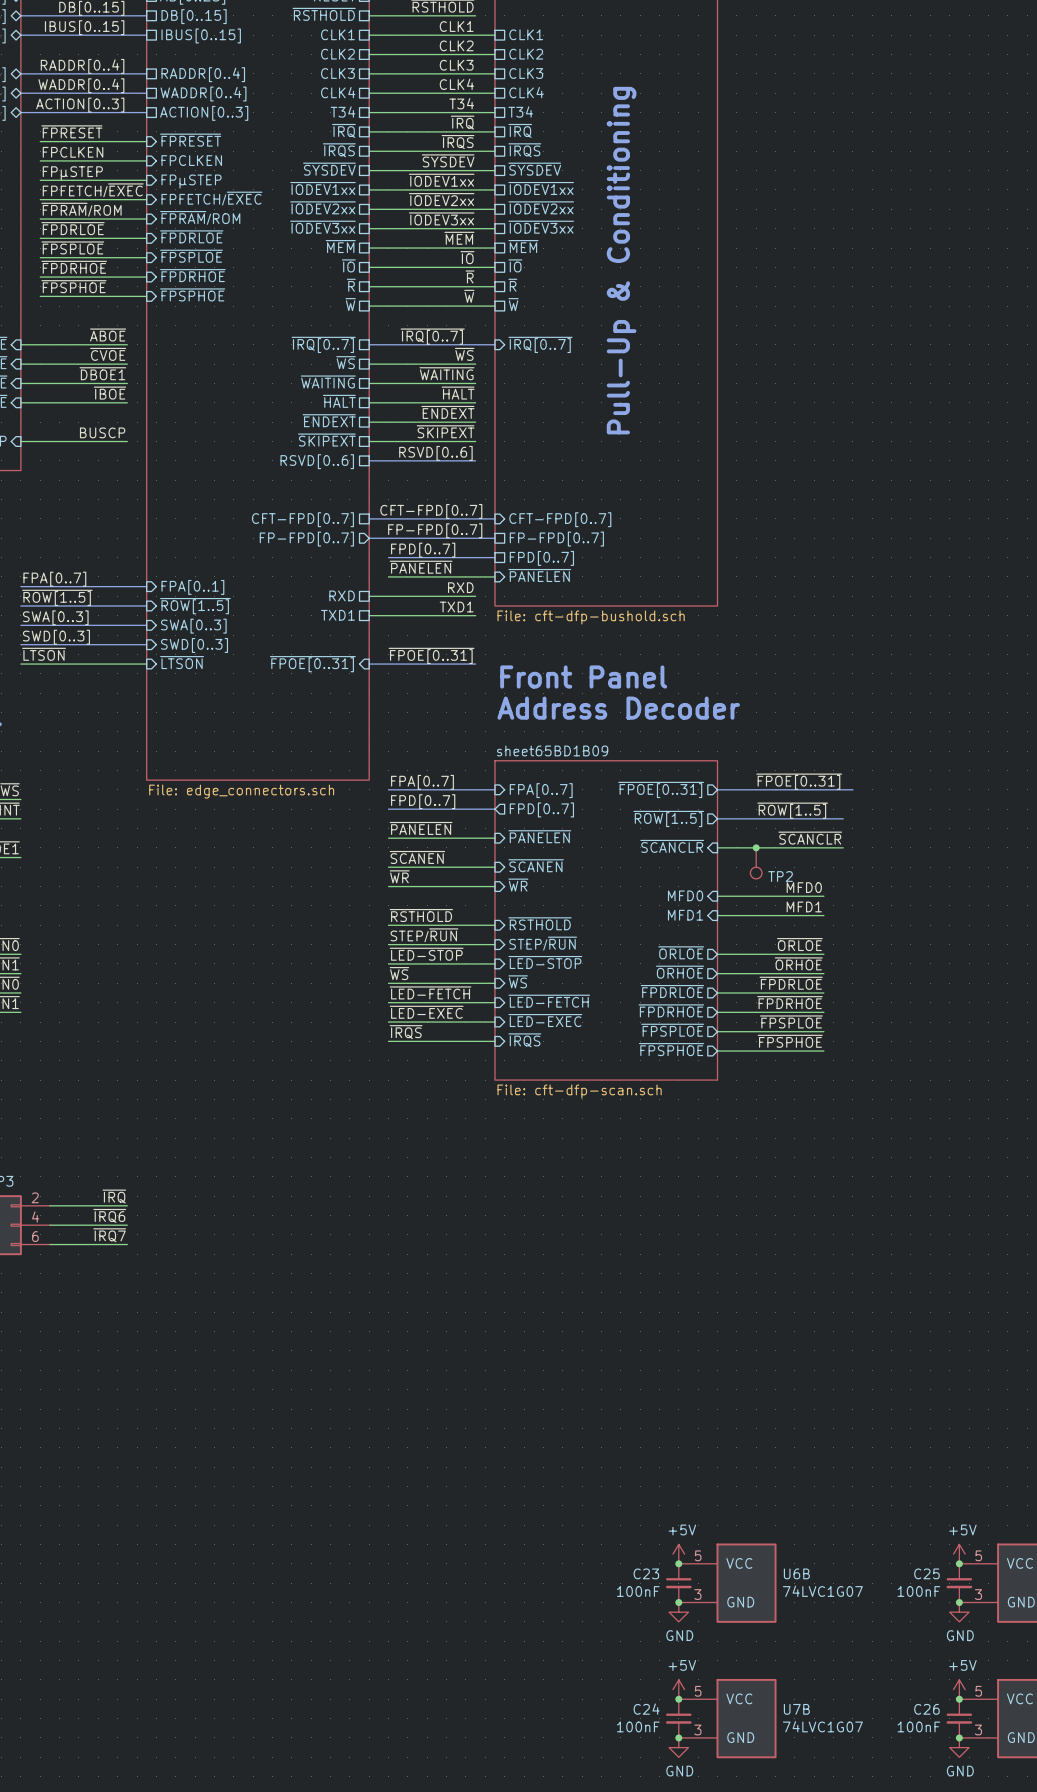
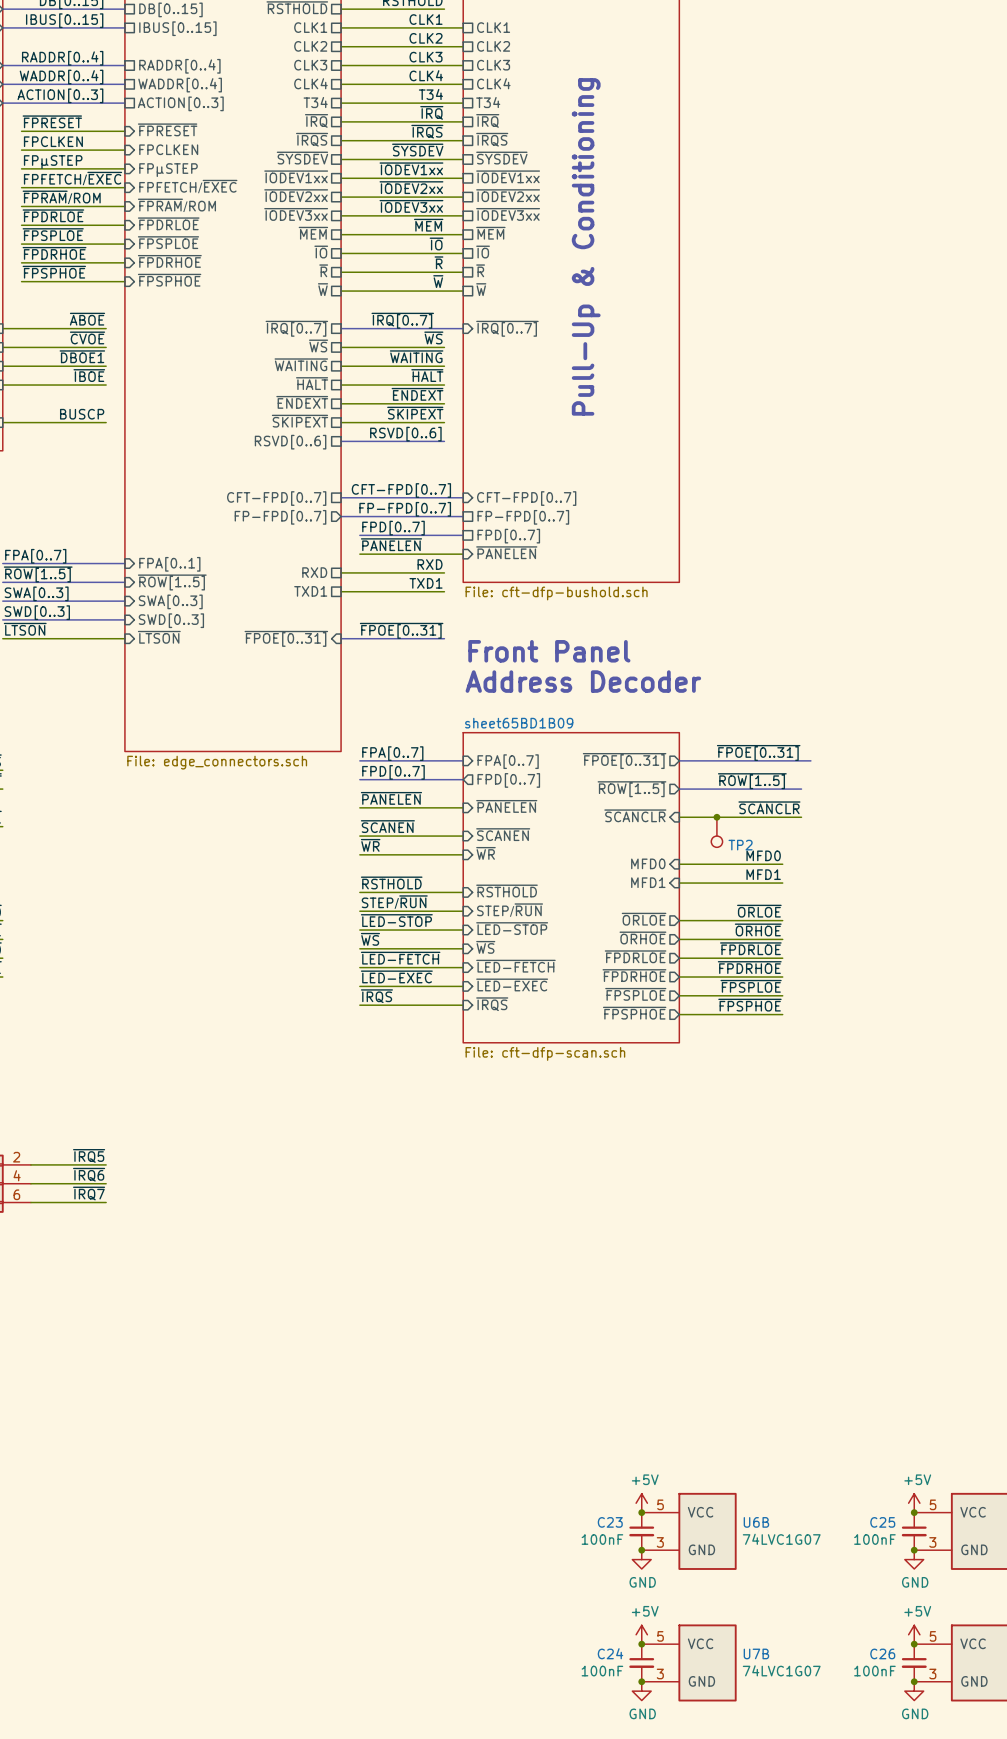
label: ~{IRQ} (114, 1196) -> ~{IRQ5} (89, 1155)

